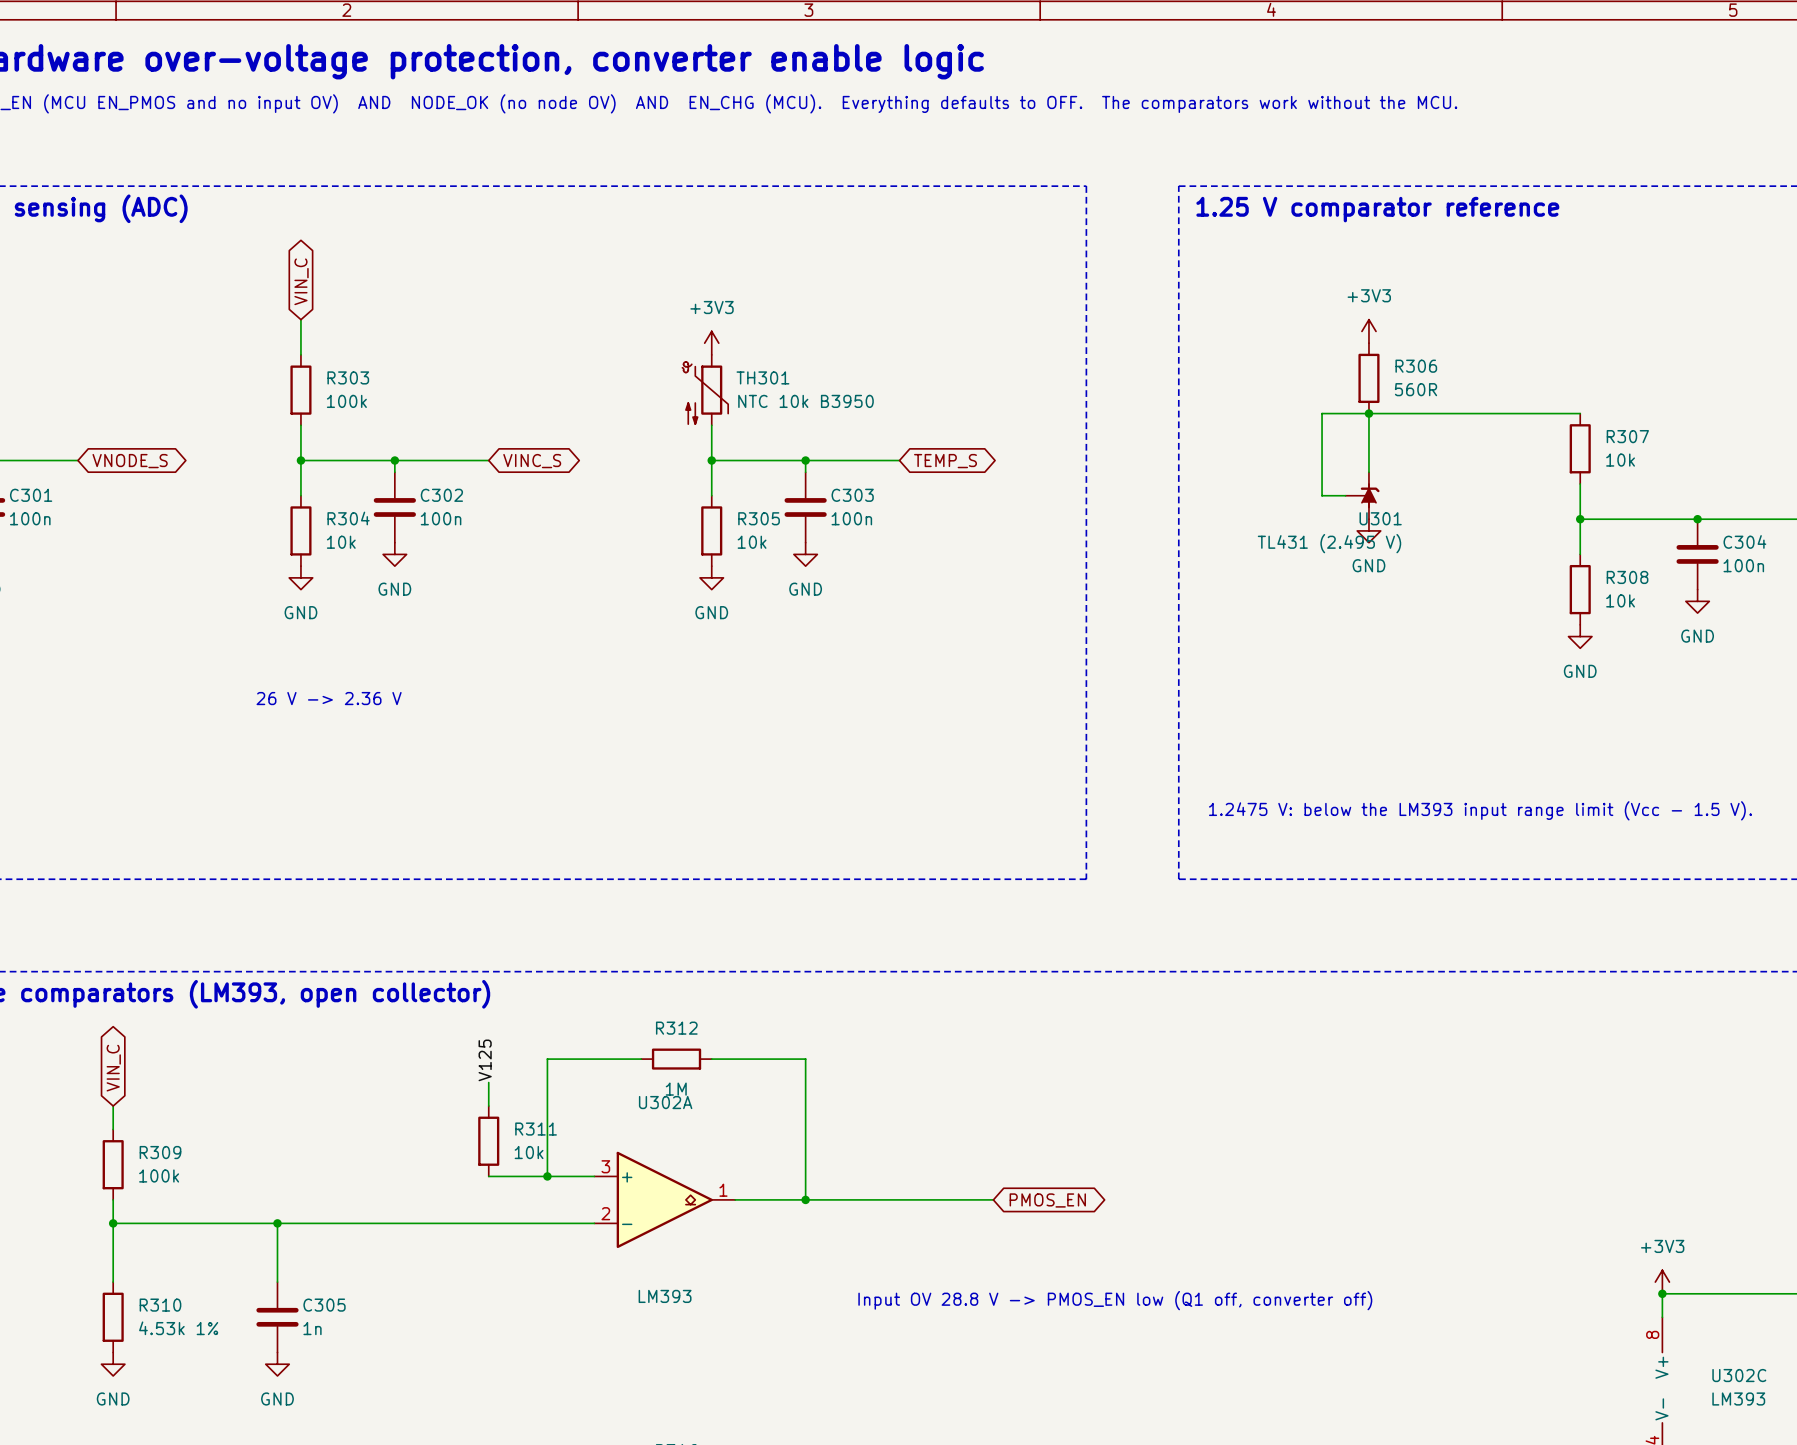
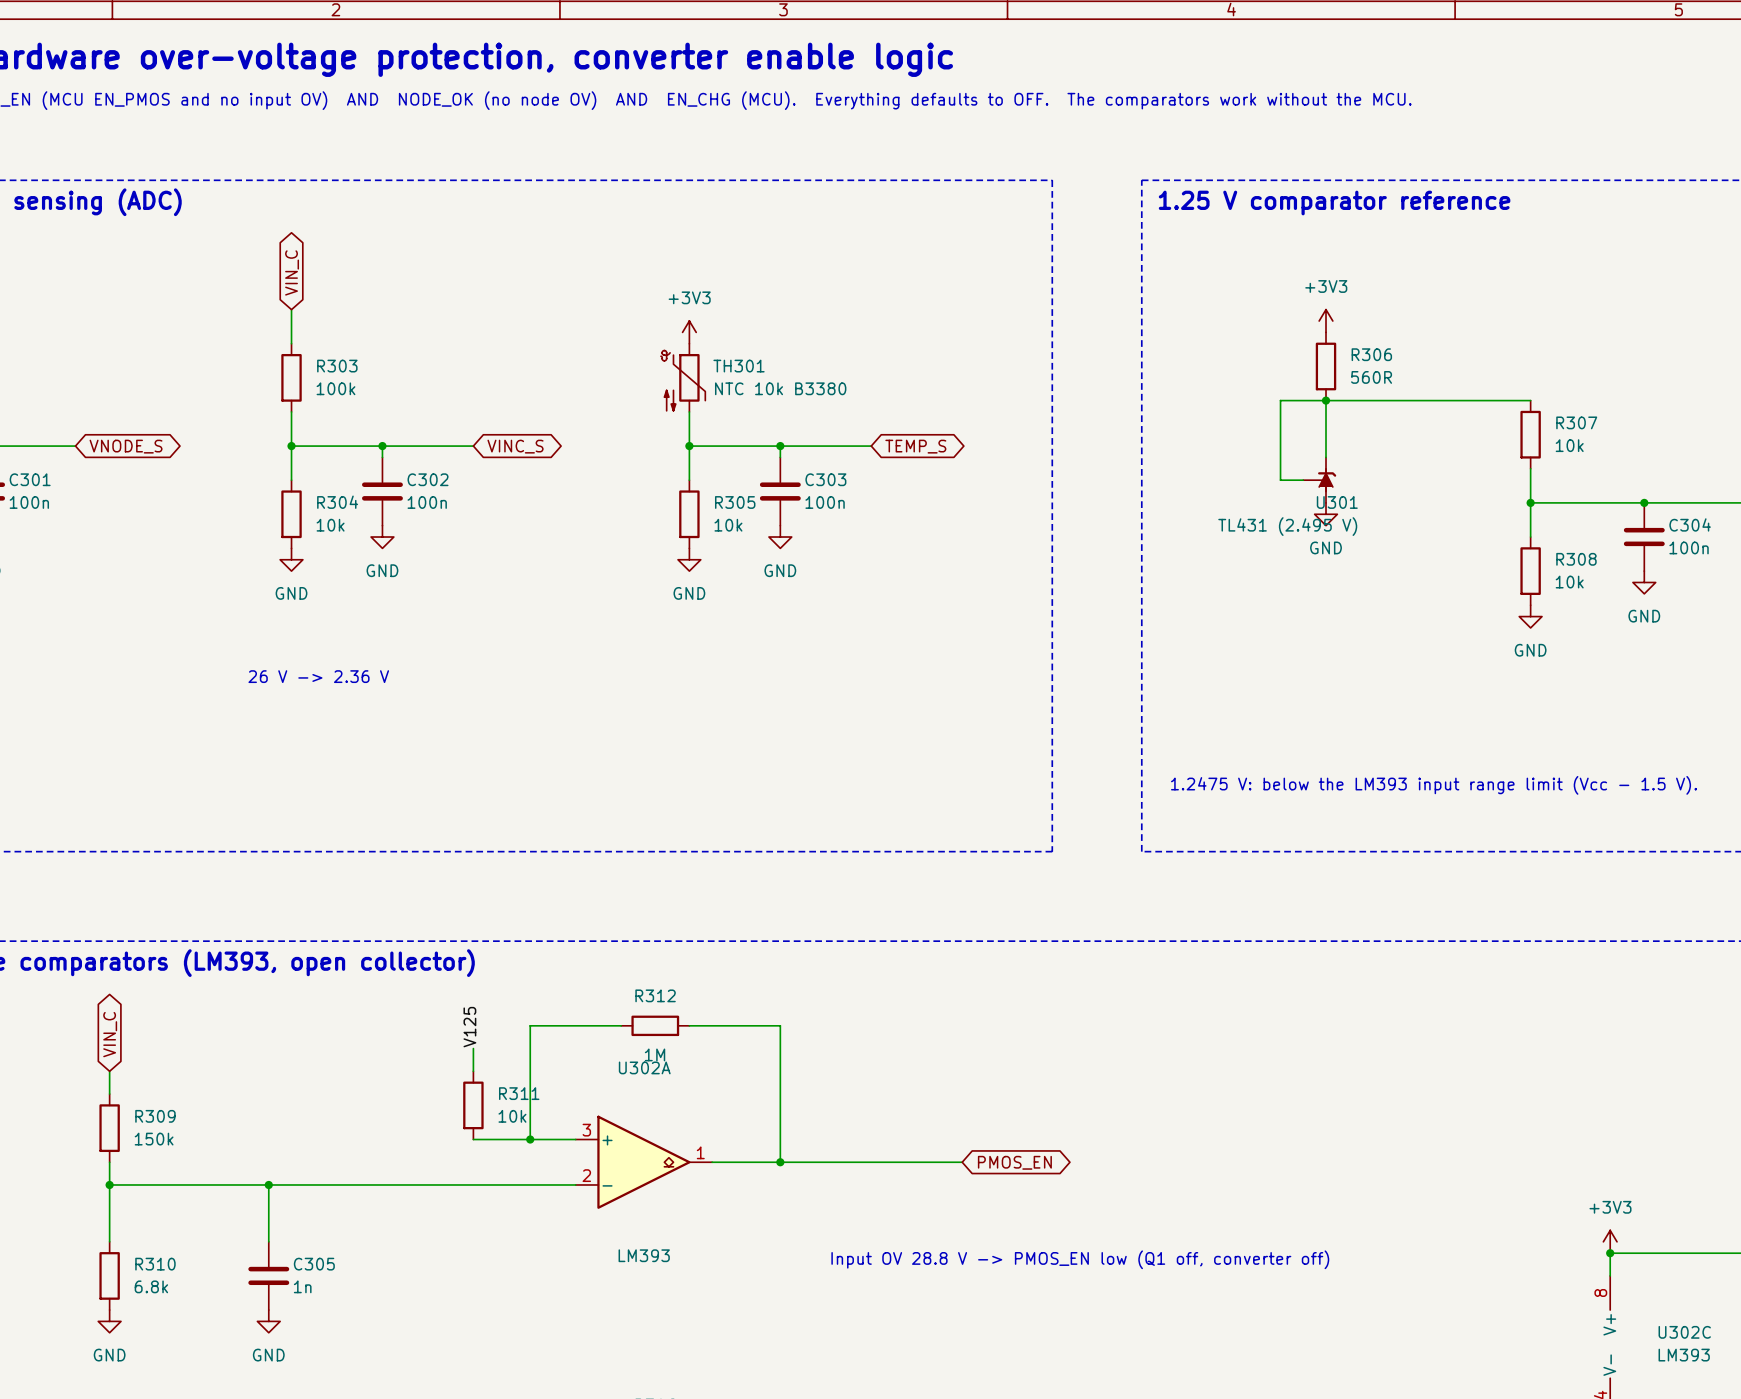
TH301 value: NTC 10k B3950 (805, 401) -> NTC 10k B3380 (780, 388)
R309 value: 100k (159, 1176) -> 150k (154, 1139)
R310 value: 4.53k 1% (178, 1328) -> 6.8k (151, 1286)

